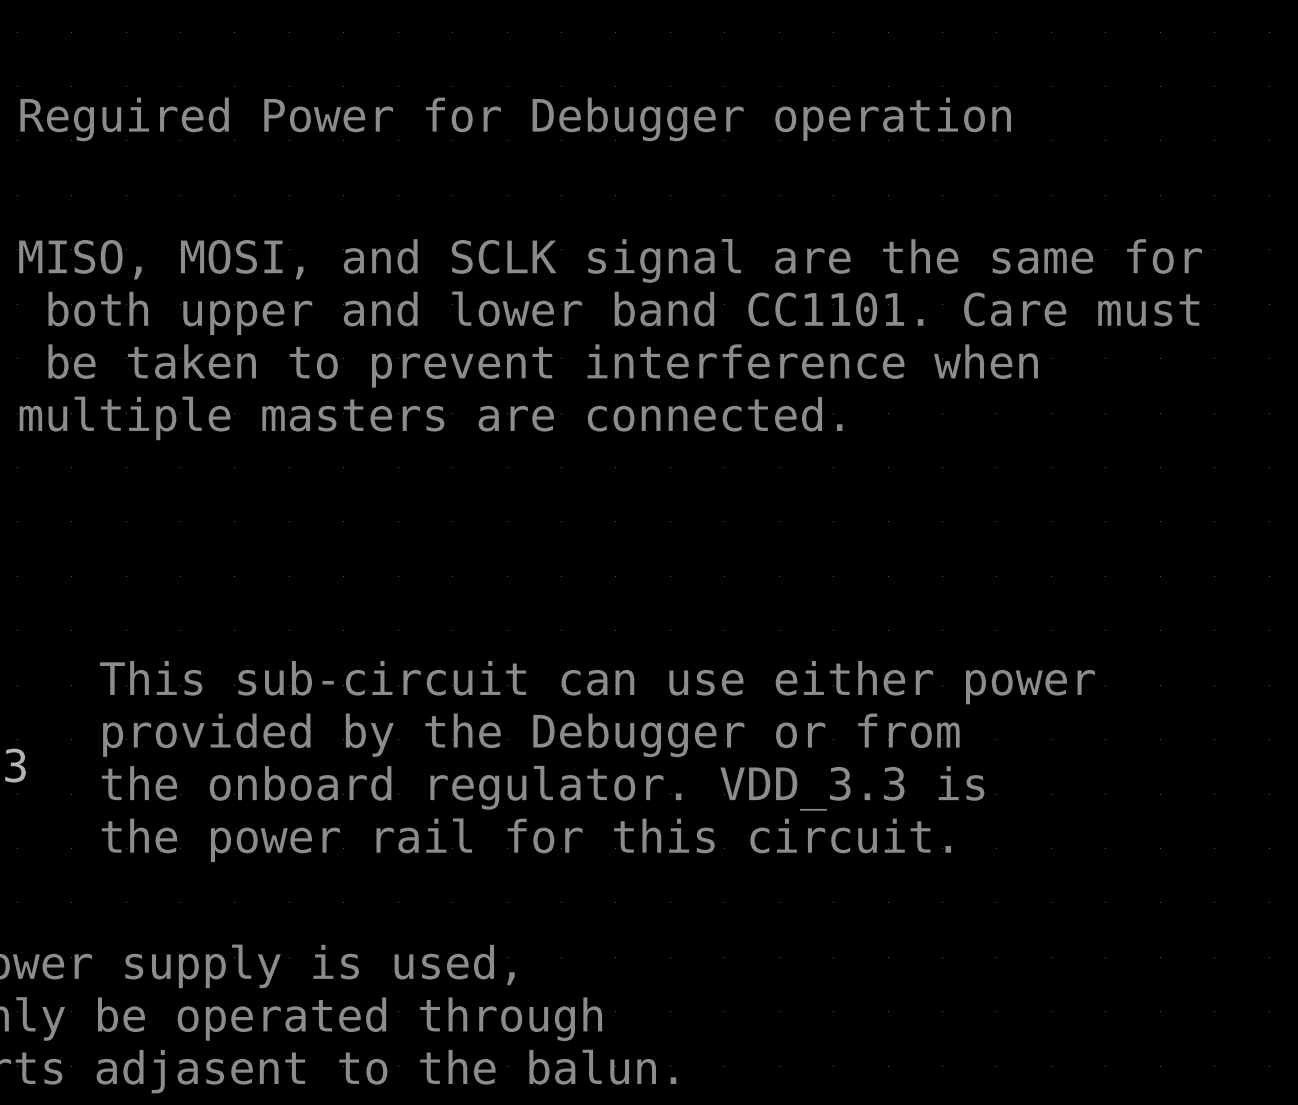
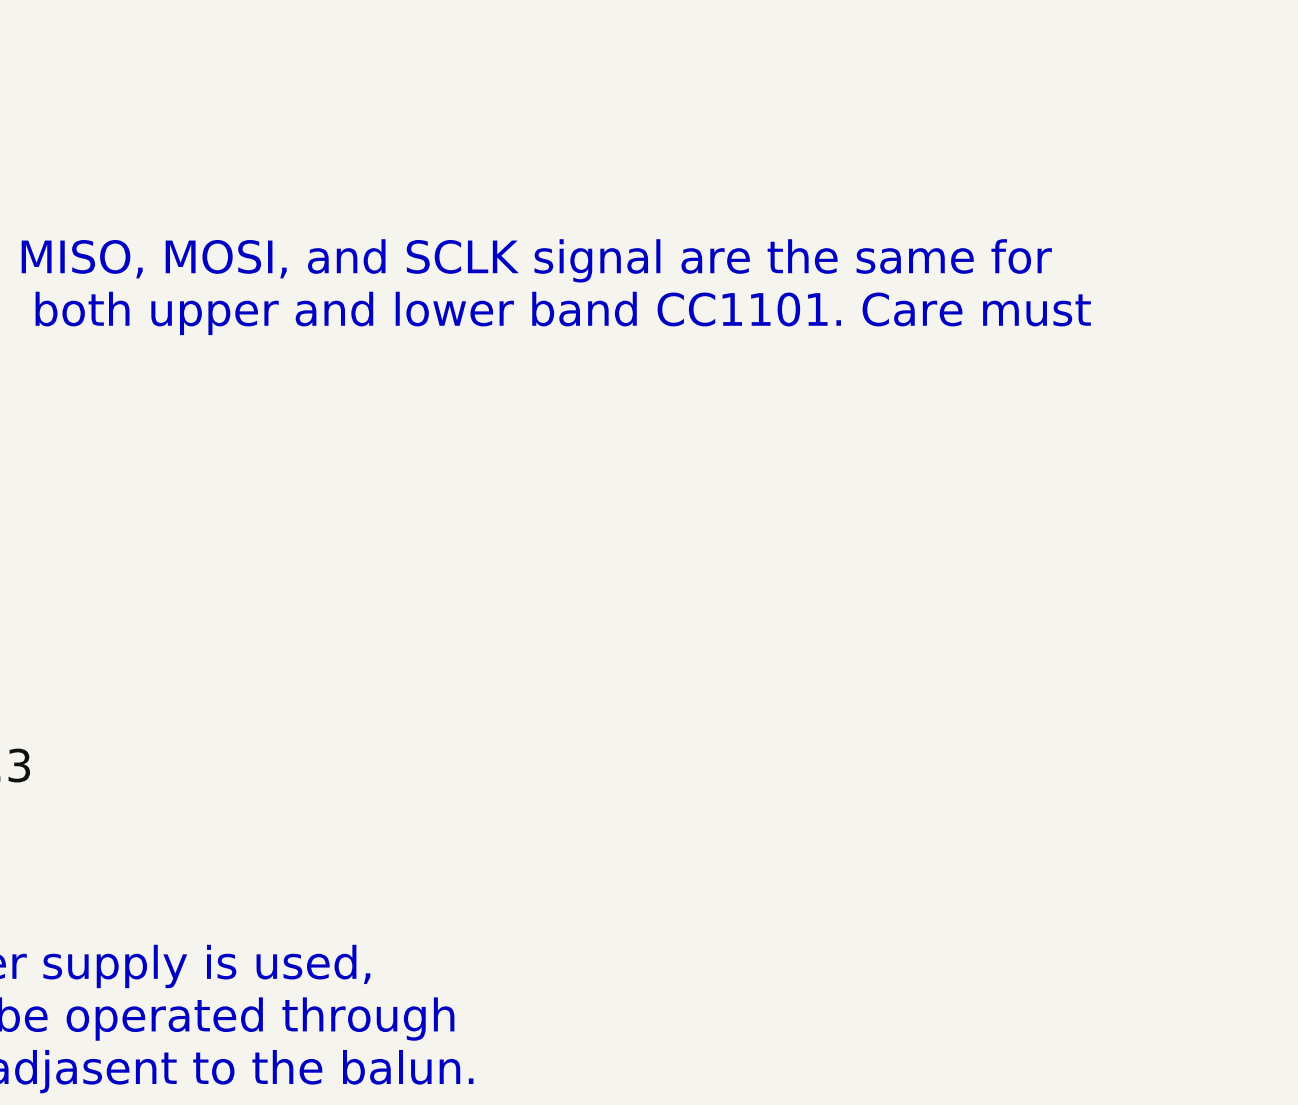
text: Reguired Power for Debugger operation (515, 119) -> none
text: be taken to prevent interference when (543, 365) -> none
text: multiple masters are connected. (431, 418) -> none
text: This sub-circuit can use either power (597, 682) -> none
text: provided by the Debugger or from (531, 735) -> none
text: the onboard regulator. VDD_3.3 is (543, 788) -> none
text: the power rail for this circuit. (526, 840) -> none

